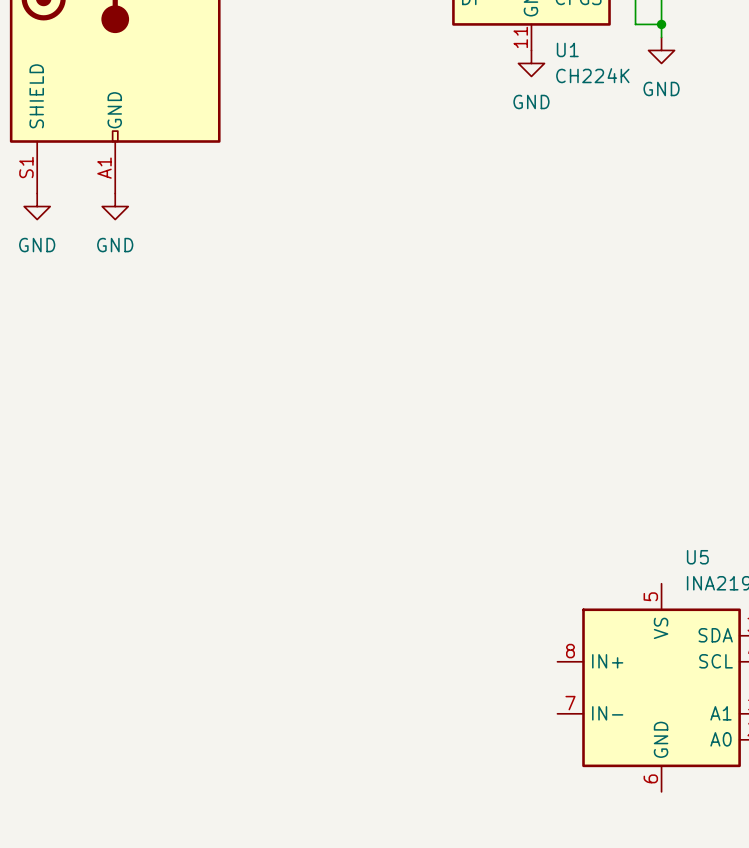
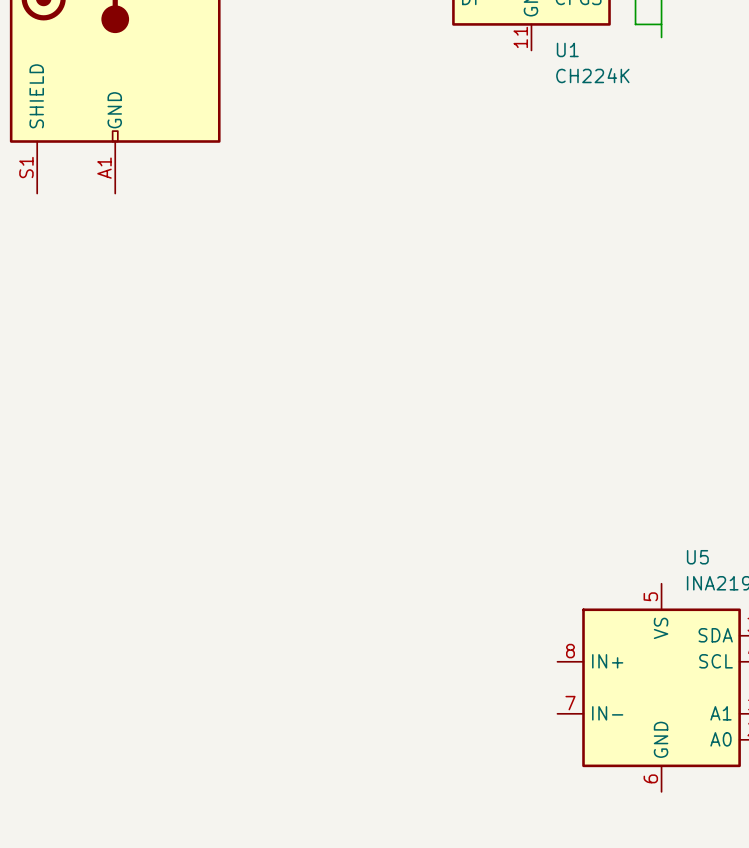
junction: (661, 24) -> none
power symbol: GND (661, 50) -> none
power symbol: GND (531, 63) -> none
power symbol: GND (37, 206) -> none
power symbol: GND (115, 206) -> none

